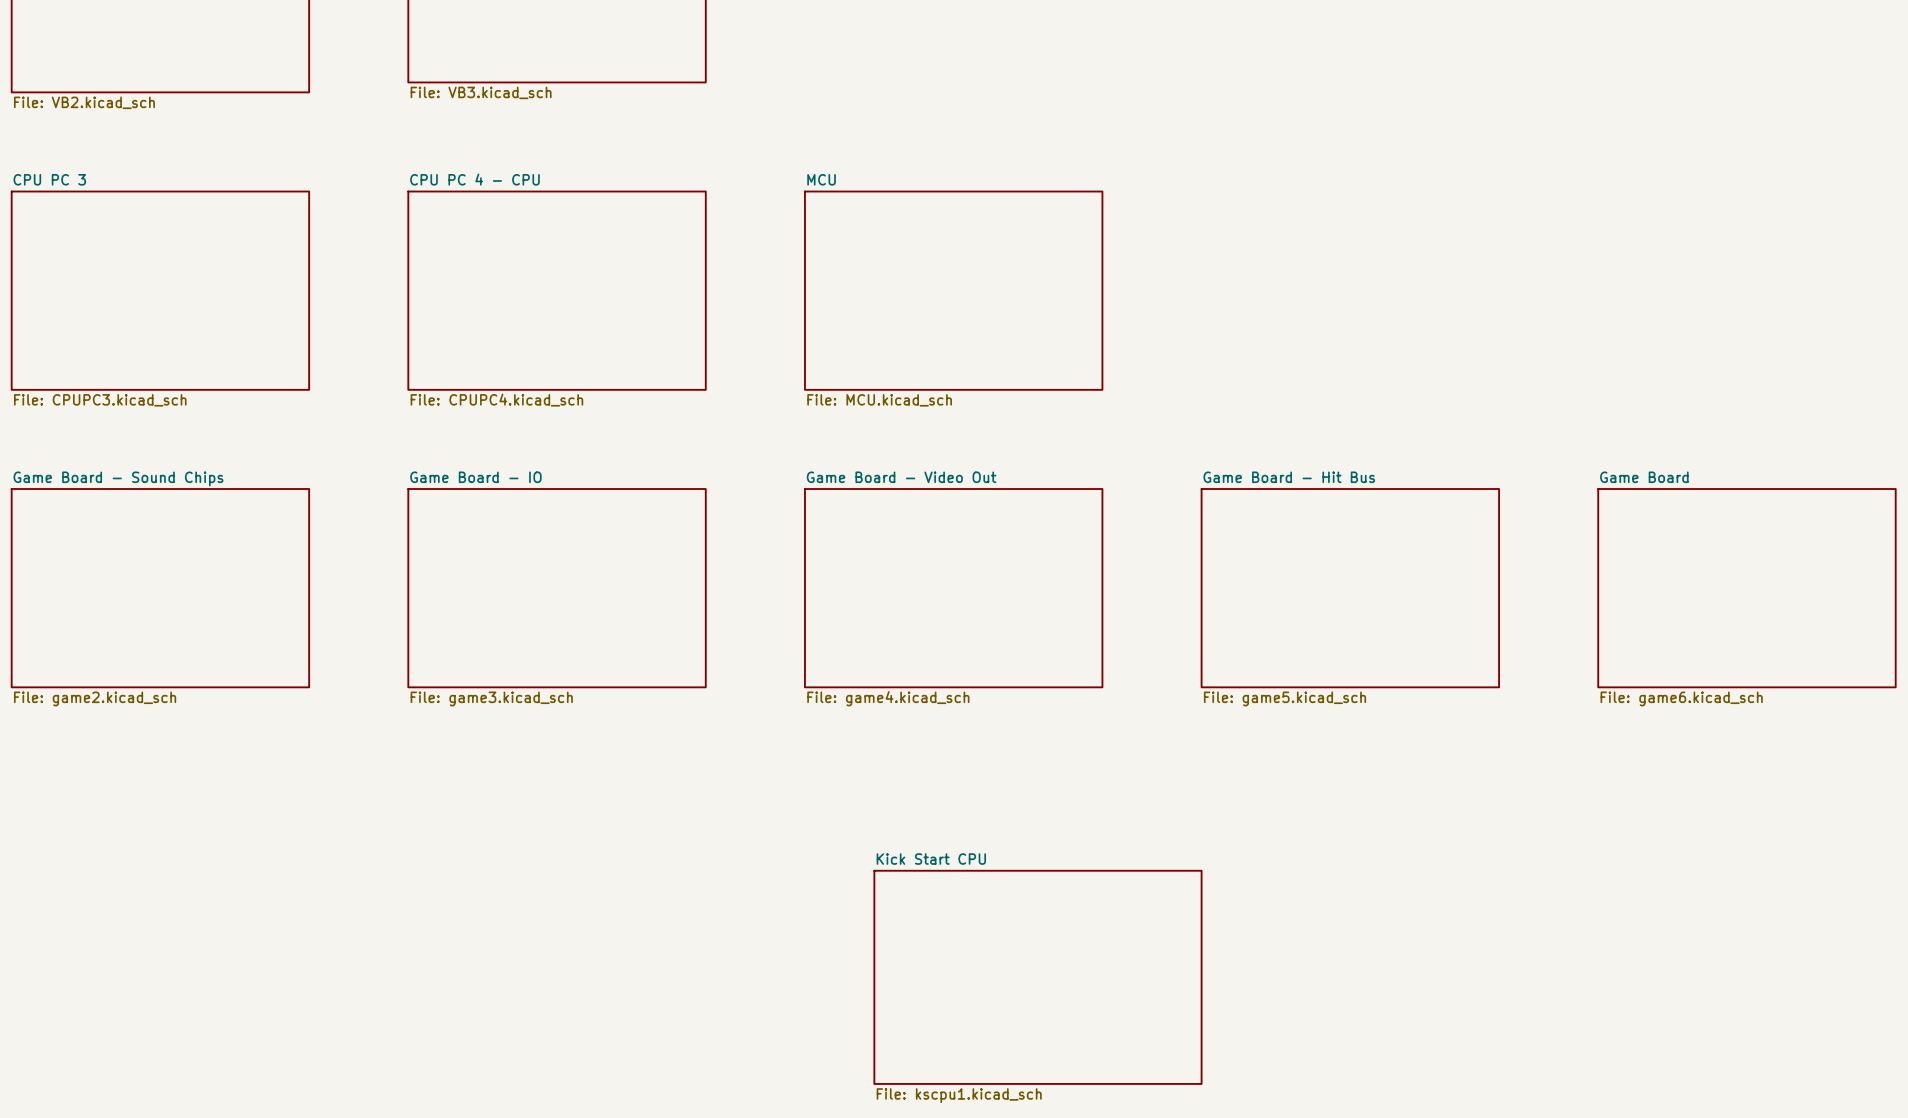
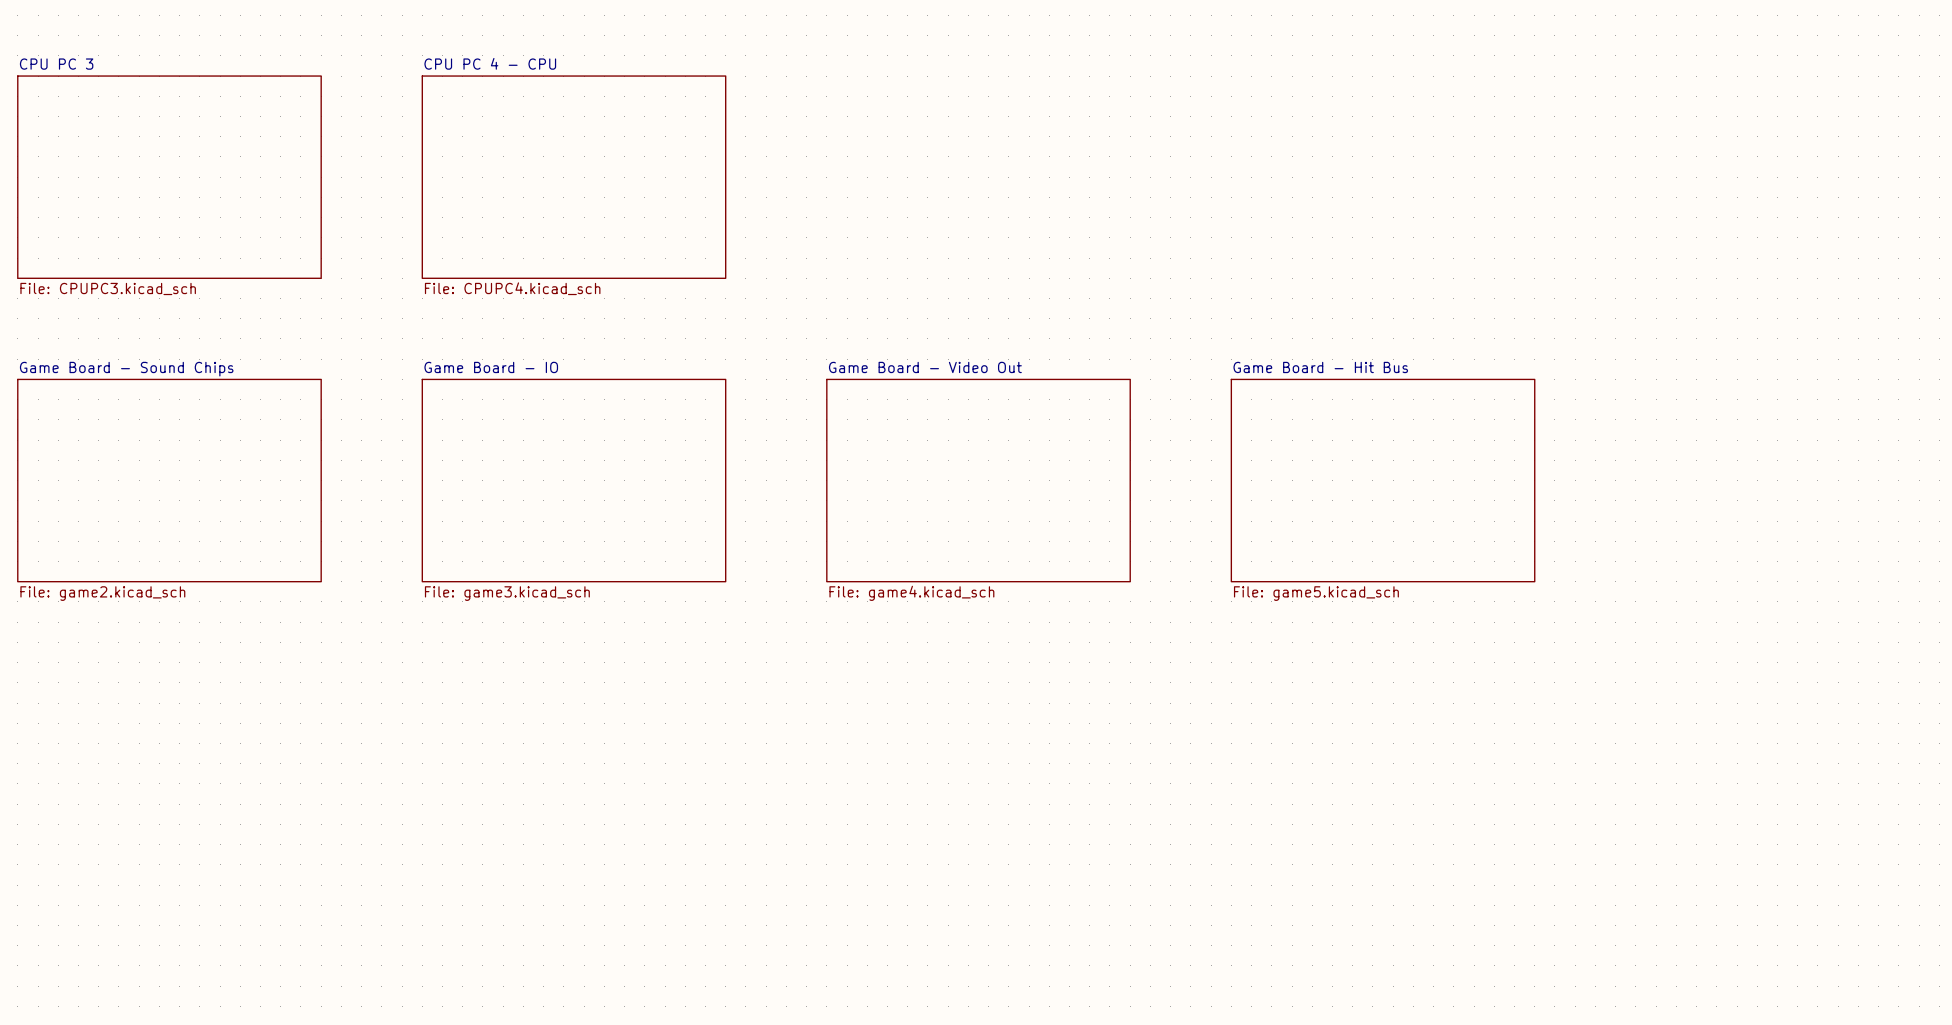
sheet MCU: File: MCU.kicad_sch (953, 290) -> none
sheet Game Board: File: game6.kicad_sch (1746, 588) -> none
sheet Kick Start CPU: File: kscpu1.kicad_sch (1037, 977) -> none

